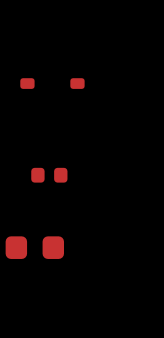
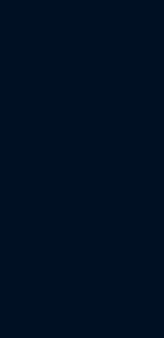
part: (52, 83) -> none
part: (49, 175) -> none
part: (34, 247) -> none

